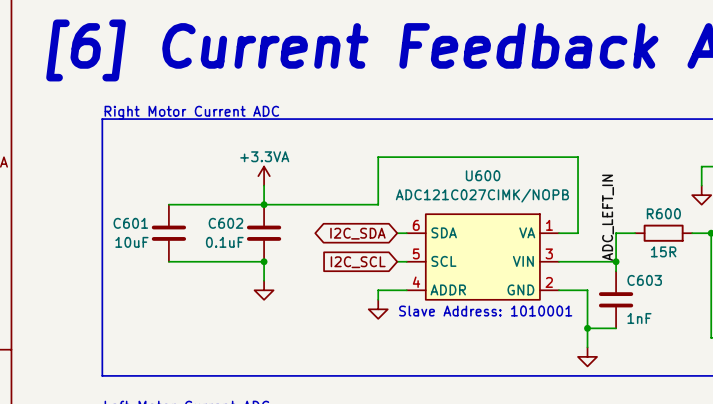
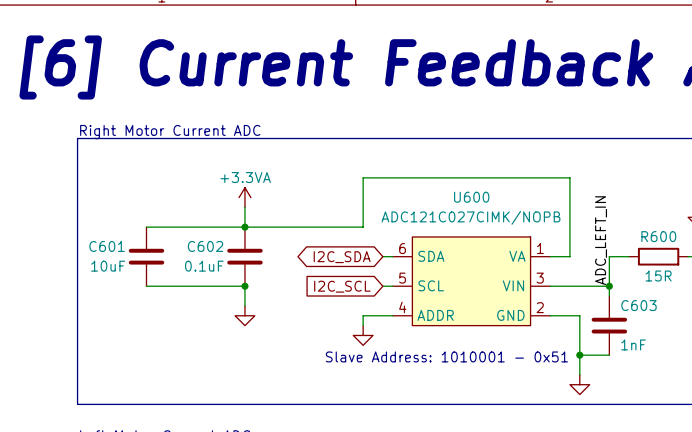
text: Slave Address: 1010001 (485, 311) -> Slave Address: 1010001 - 0x51 (446, 356)

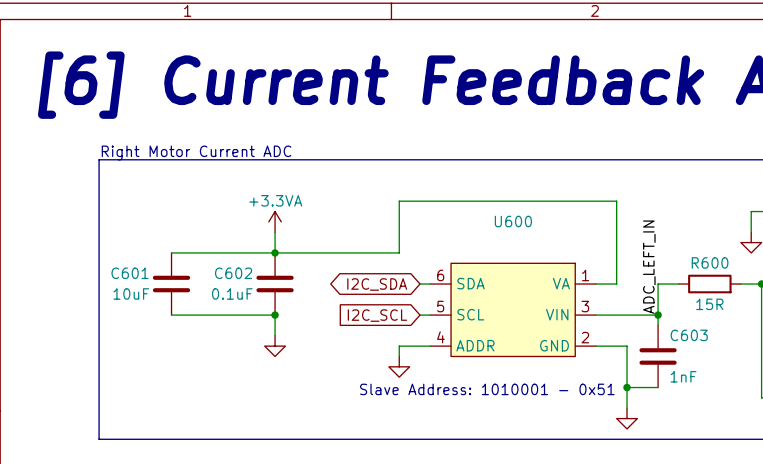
U600 value: ADC121C027CIMK/NOPB (471, 217) -> none

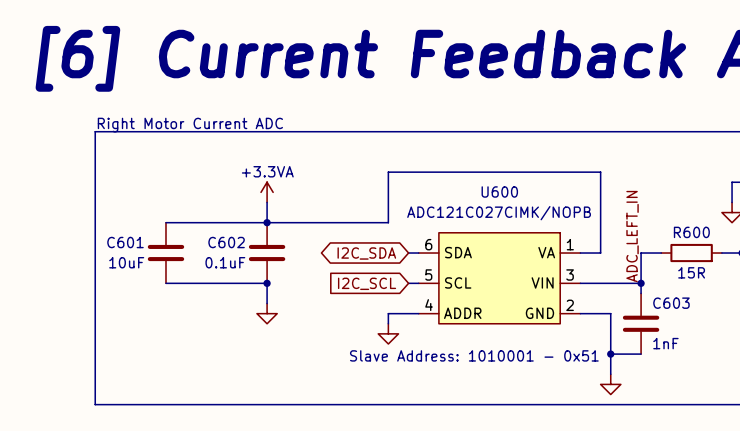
U600 value: none -> ADC121C027CIMK/NOPB (499, 213)

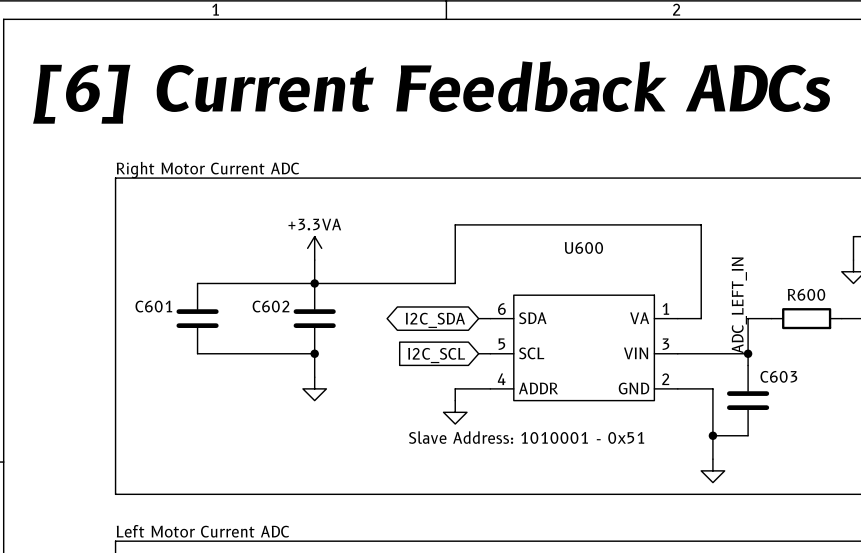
U600 value: ADC121C027CIMK/NOPB (499, 213) -> none
C601 value: 10uF (126, 262) -> none
C602 value: 0.1uF (225, 262) -> none
R600 value: 15R (691, 272) -> none
C603 value: 1nF (665, 343) -> none

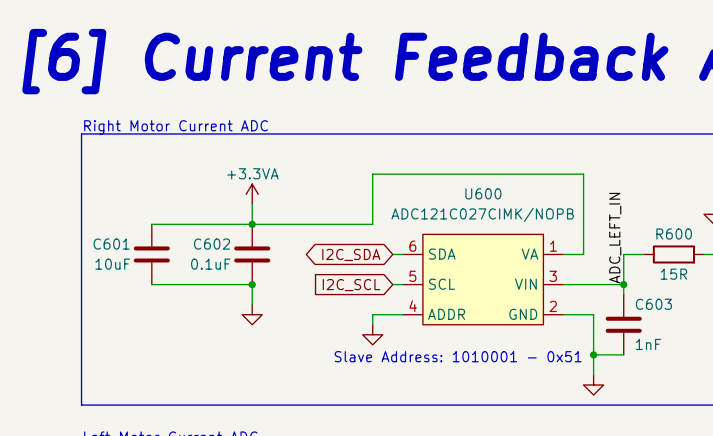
U600 value: none -> ADC121C027CIMK/NOPB (482, 214)
C601 value: none -> 10uF (112, 264)
C602 value: none -> 0.1uF (210, 264)
R600 value: none -> 15R (673, 274)
C603 value: none -> 1nF (648, 344)

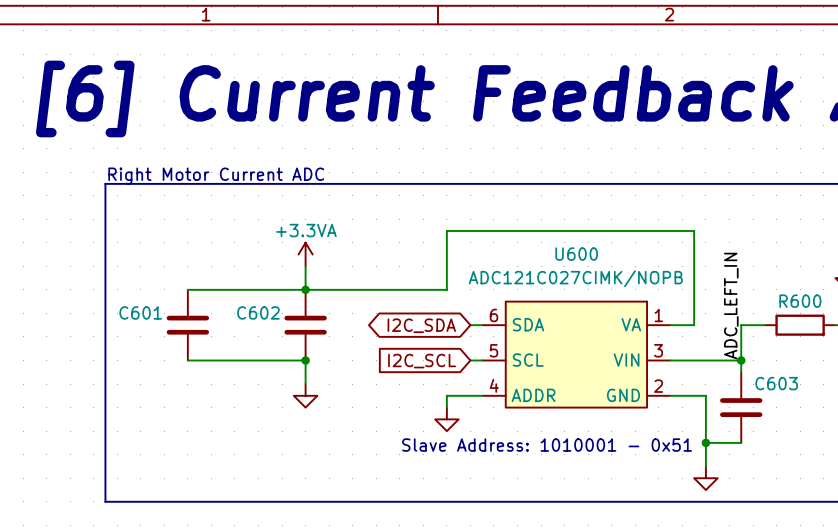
C601 value: 10uF (112, 264) -> none
C602 value: 0.1uF (210, 264) -> none
R600 value: 15R (673, 274) -> none
C603 value: 1nF (648, 344) -> none

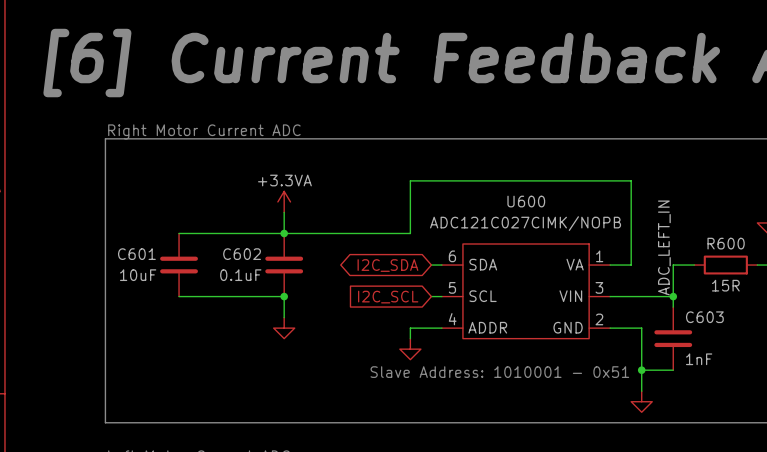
C601 value: none -> 10uF (138, 275)
C602 value: none -> 0.1uF (240, 275)
R600 value: none -> 15R (725, 285)
C603 value: none -> 1nF (699, 359)

